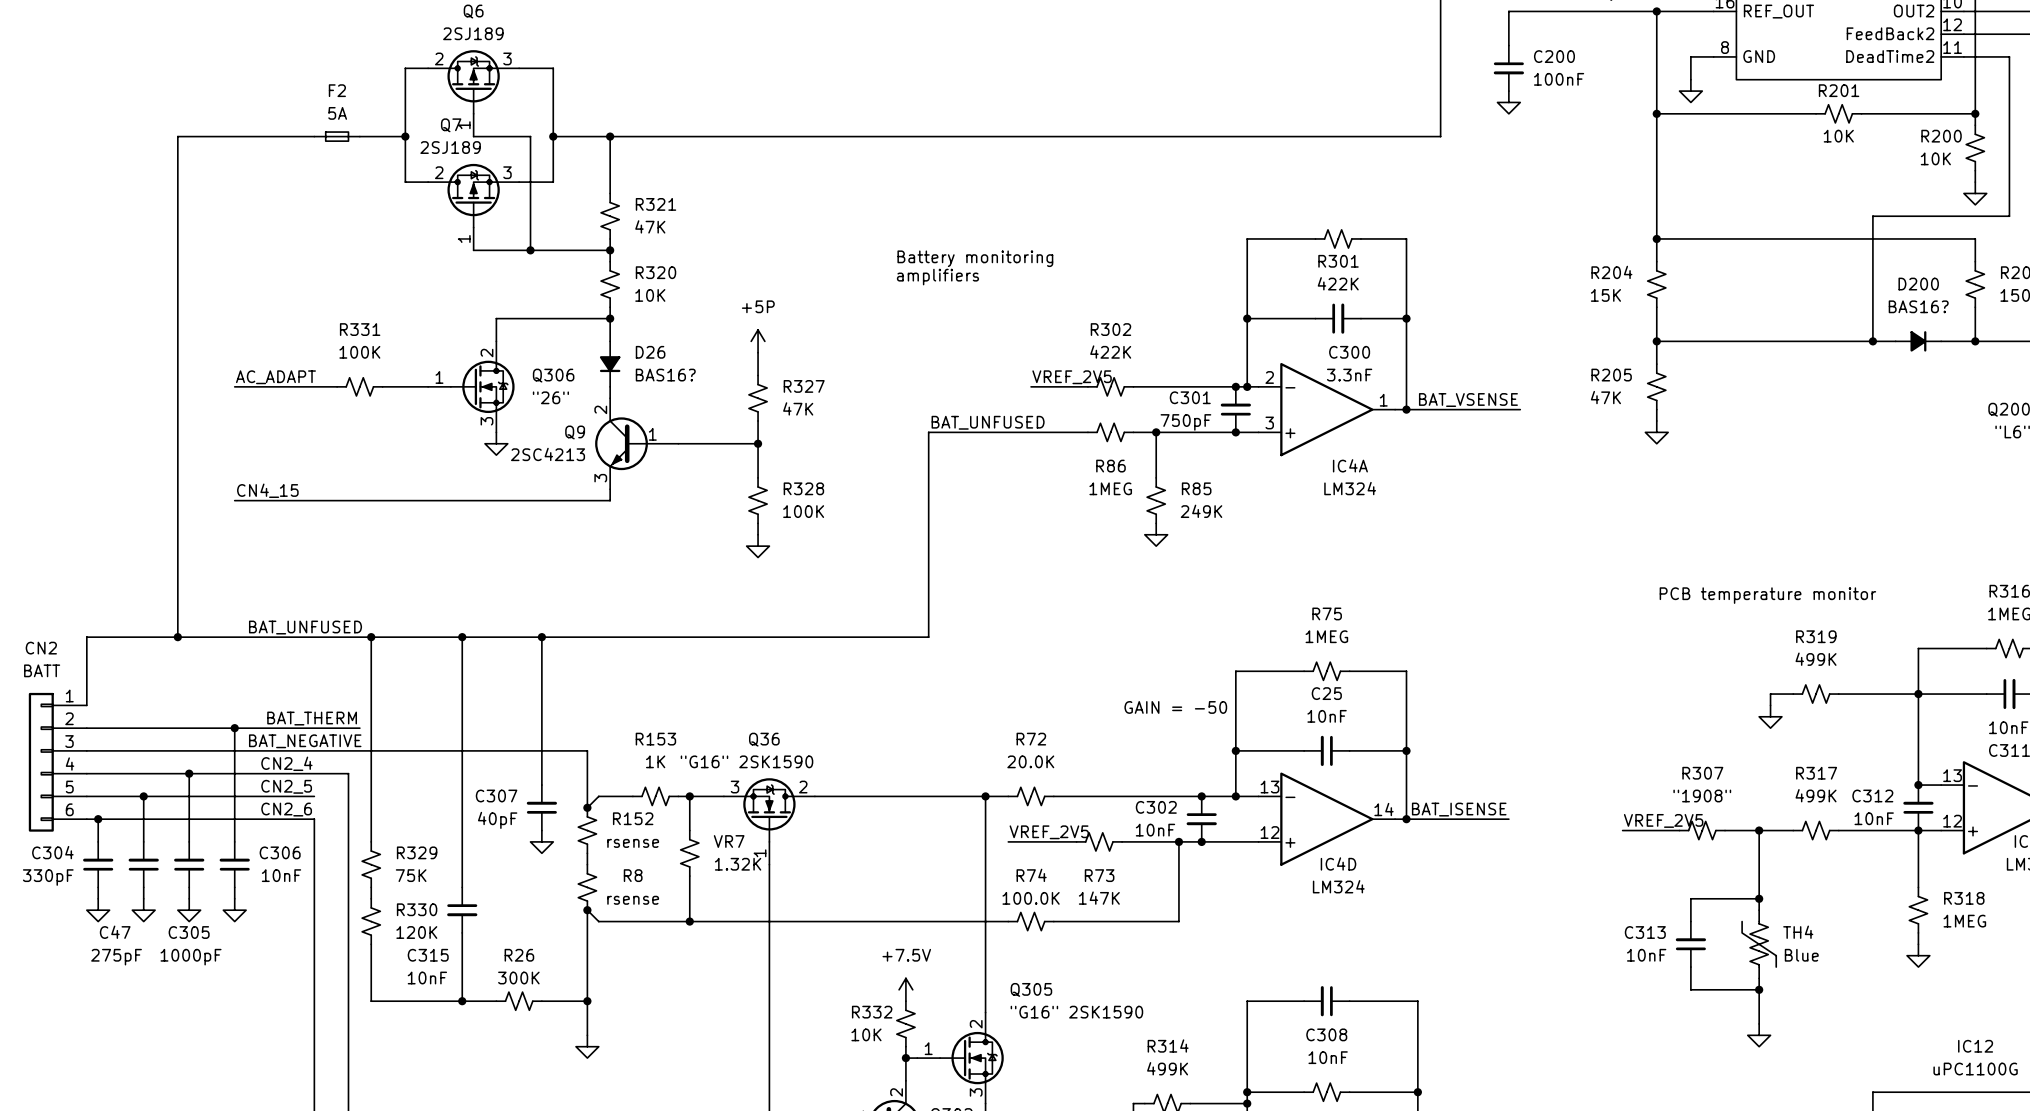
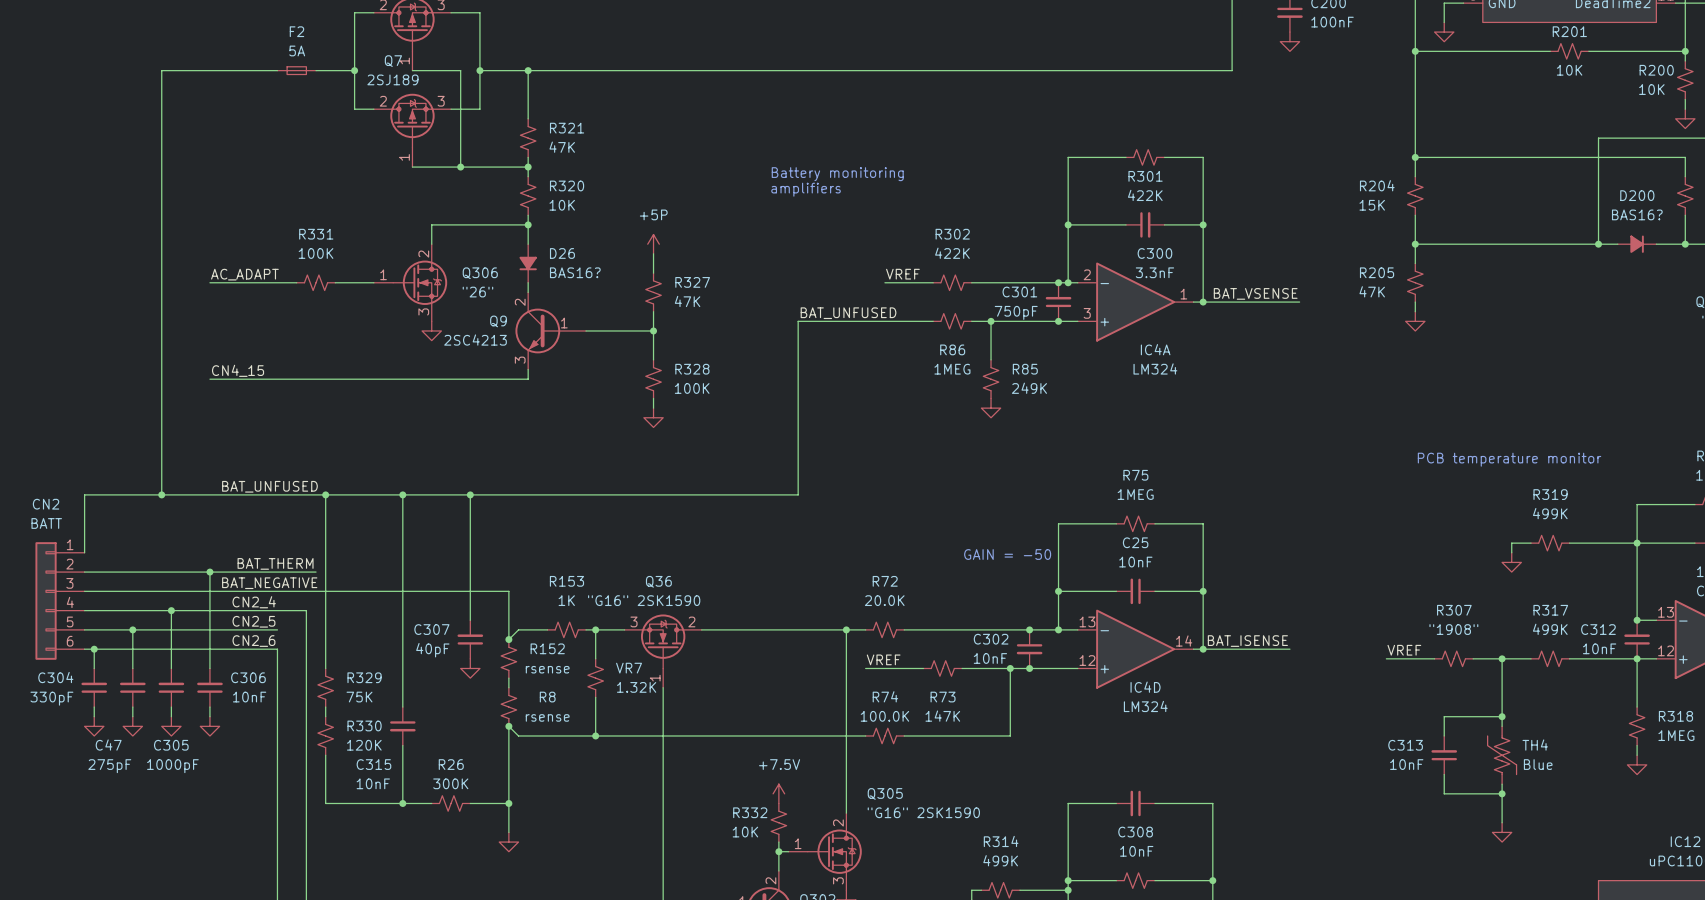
label: VREF_2V5 (1072, 377) -> VREF (902, 274)
label: VREF_2V5 (1663, 820) -> VREF (1404, 650)
label: VREF_2V5 (1049, 832) -> VREF (883, 659)

